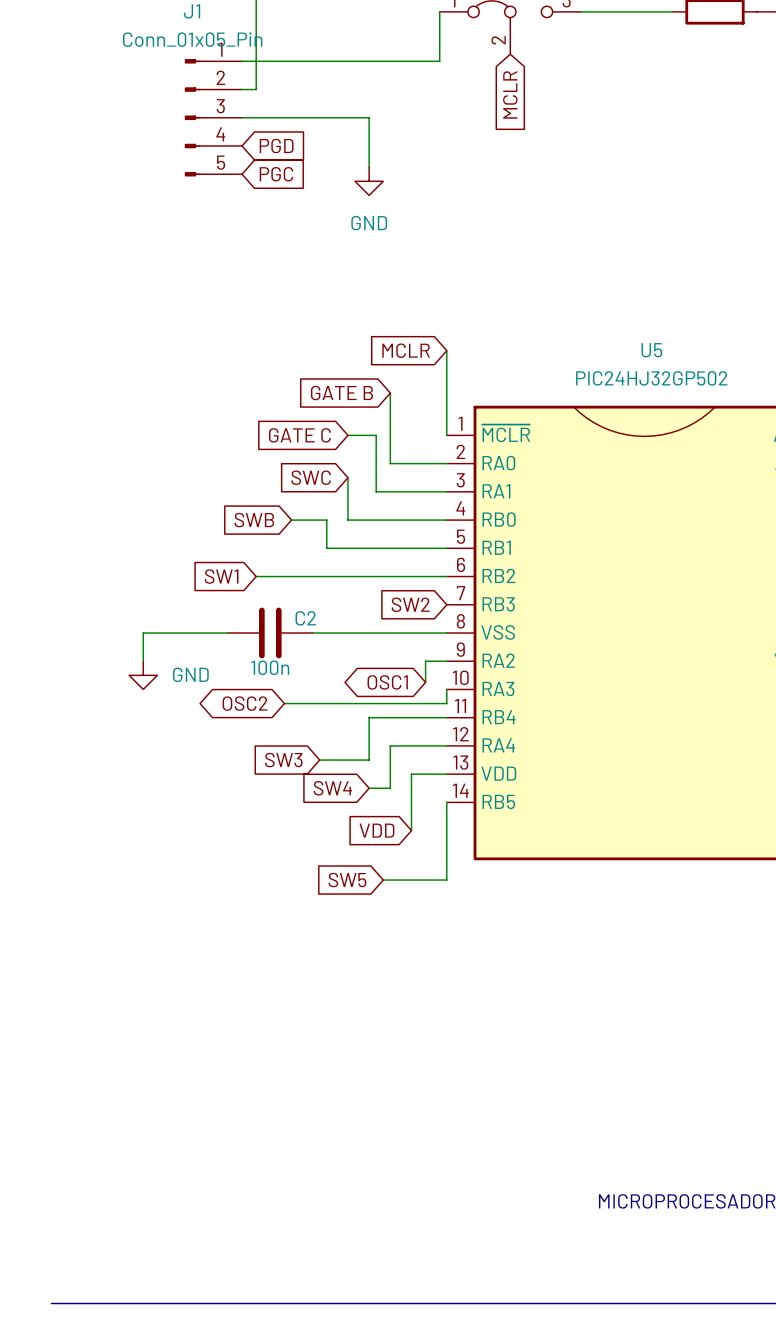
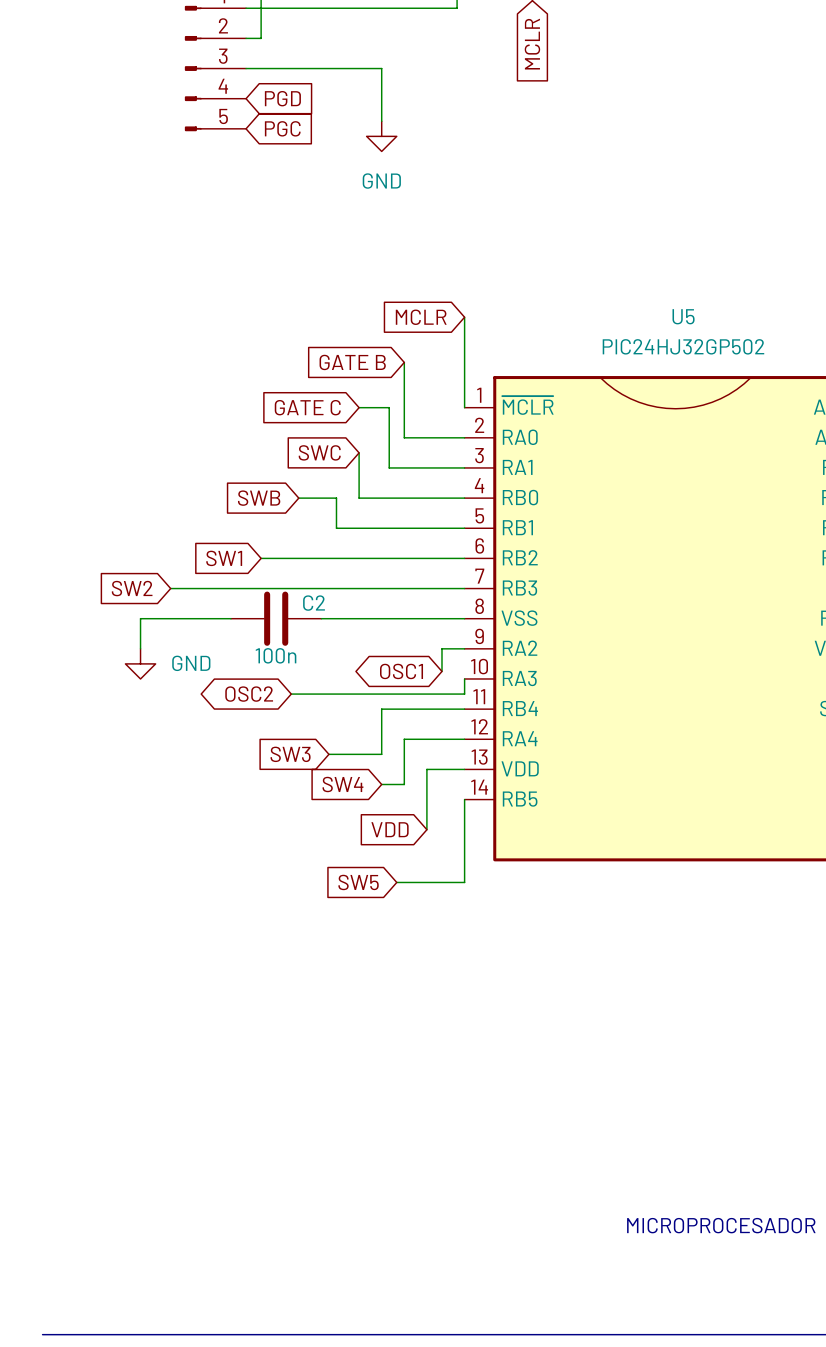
wire: none -> (170, 588) (464, 588)
global label position: SW2 (410, 604) -> SW2 (132, 588)

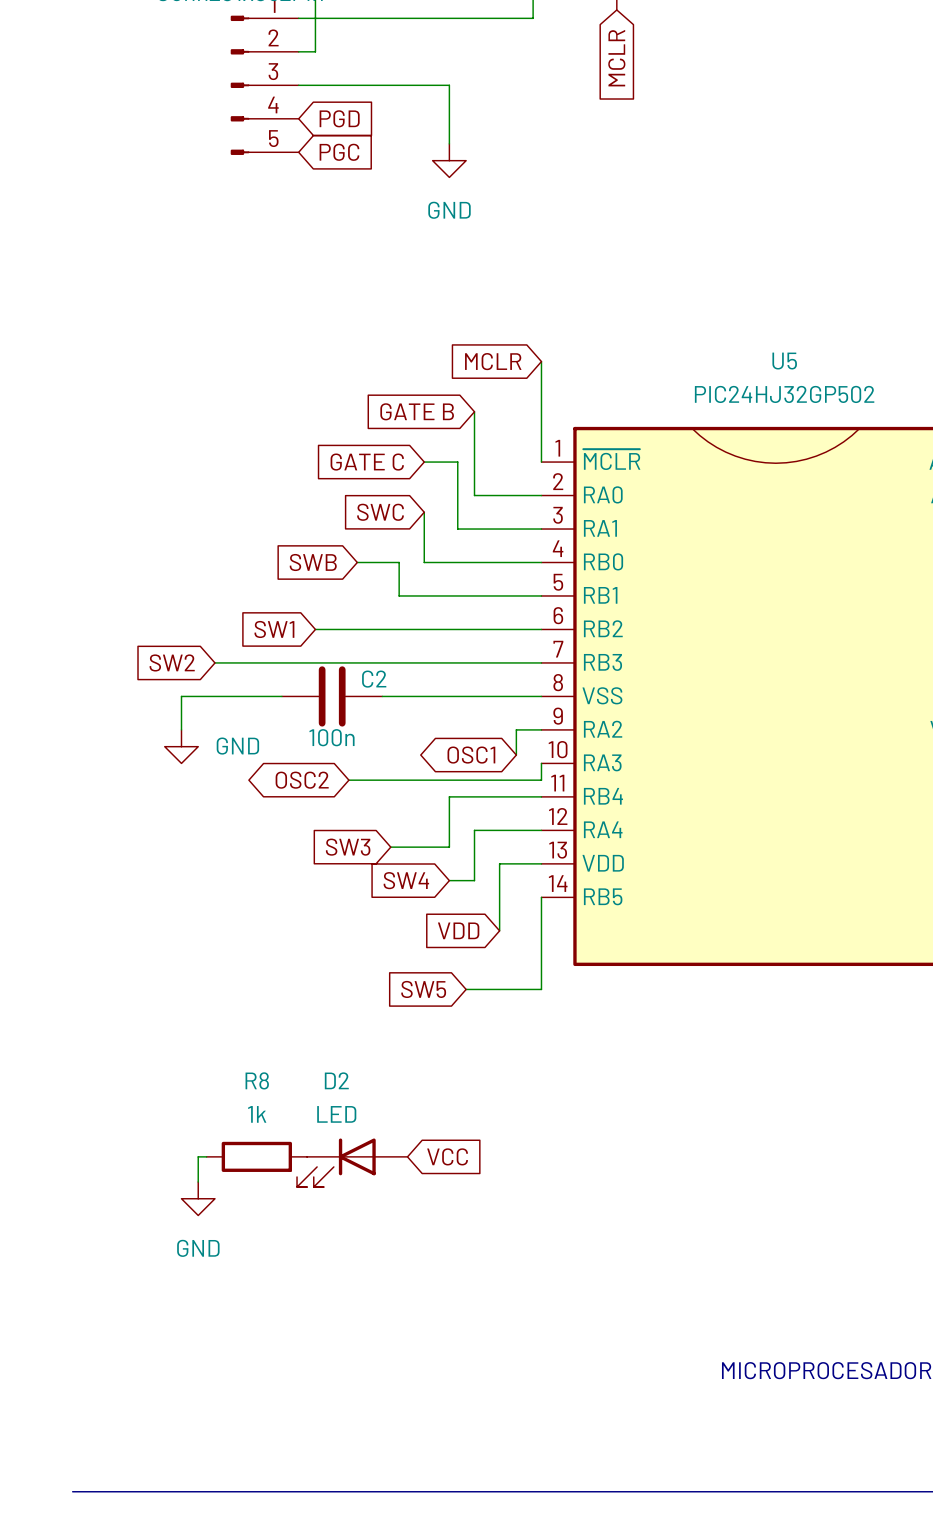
wire: none -> (206, 1156) (198, 1156) (198, 1182)
R8: none -> 1k (256, 1156)
global label: none -> VCC (447, 1156)
D2: none -> LED (352, 1162)
power symbol: none -> GND (198, 1198)

